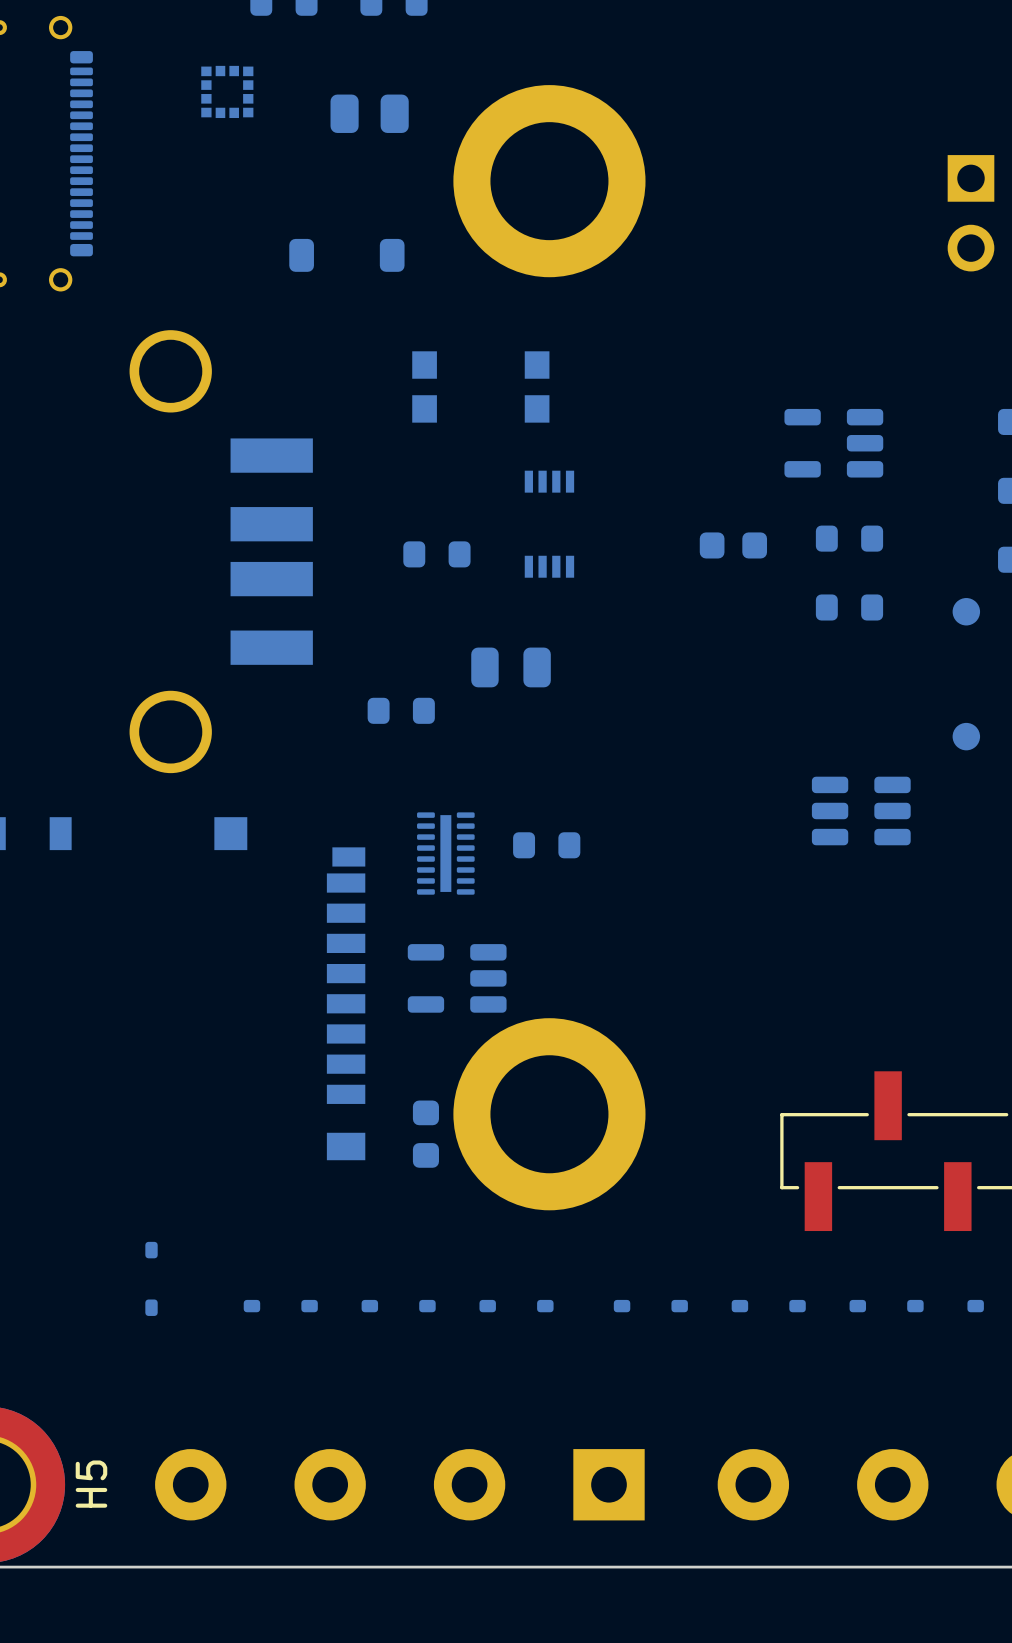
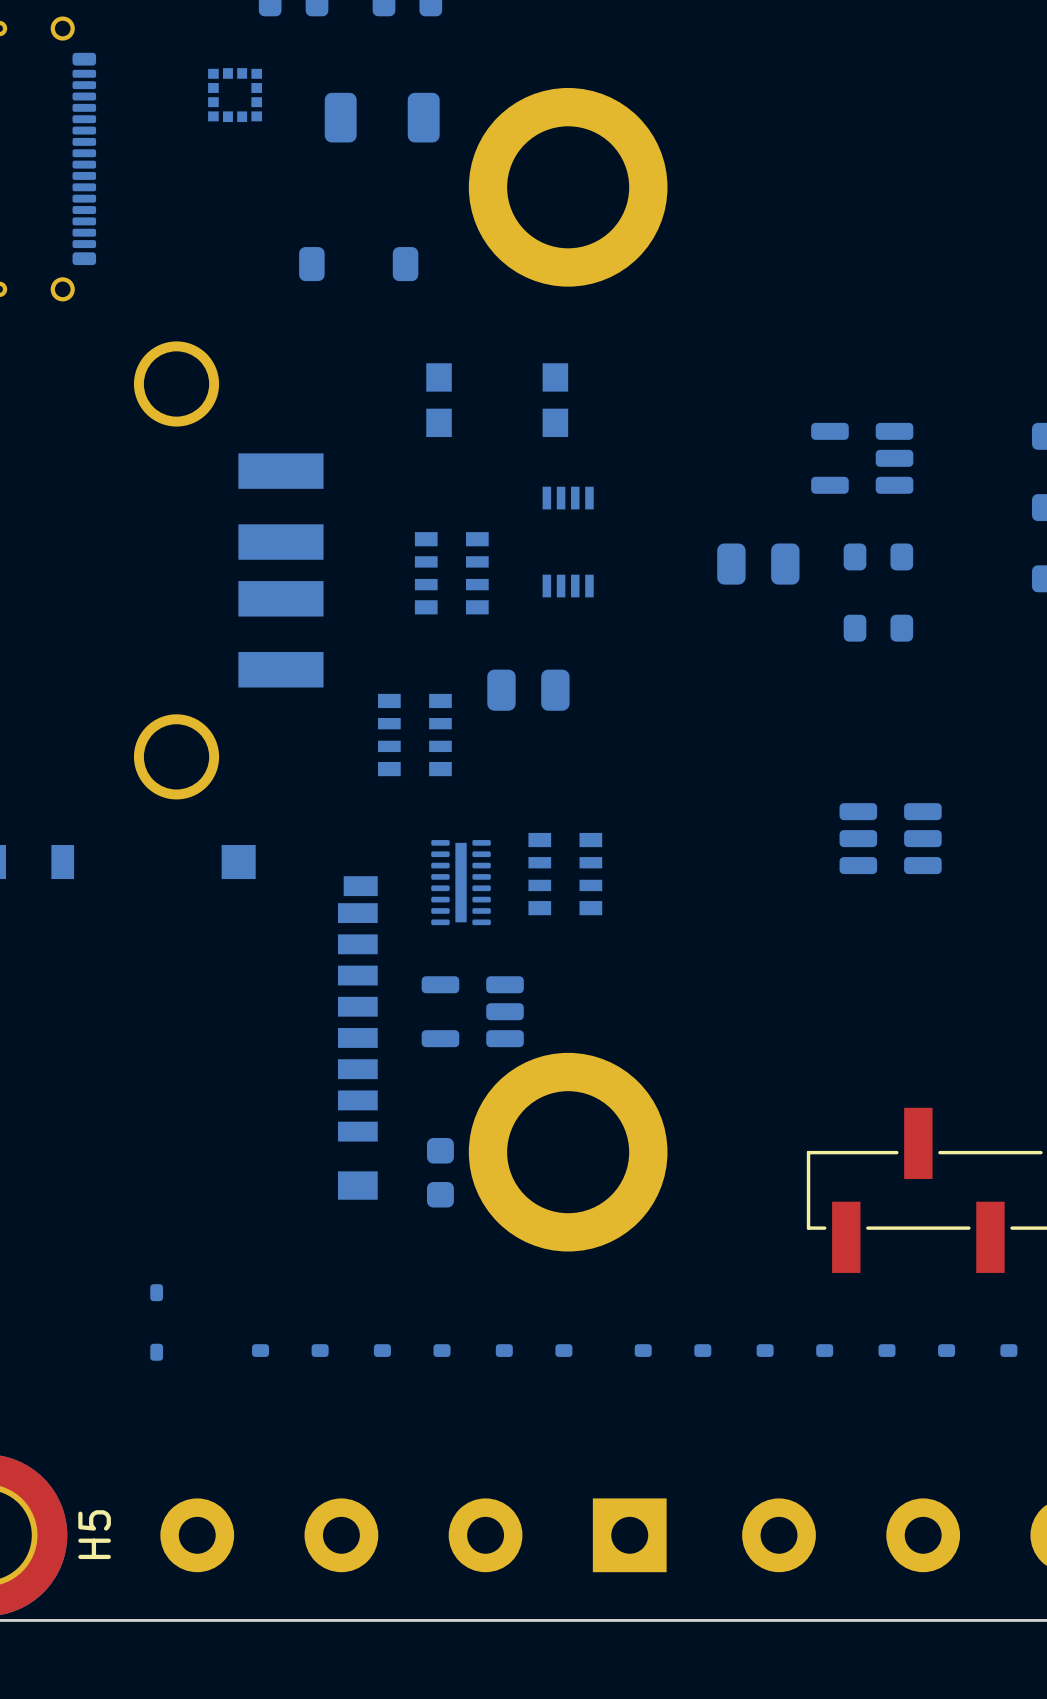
part footprint: [330, 94, 409, 133] -> [324, 92, 440, 143]
part: (970, 213) -> none
part footprint: [699, 532, 768, 559] -> [717, 543, 800, 585]
part footprint: [403, 541, 471, 568] -> [414, 532, 489, 615]
part: (966, 611) -> none
part footprint: [367, 697, 435, 724] -> [378, 693, 452, 777]
part: (966, 736) -> none
part footprint: [513, 832, 581, 859] -> [528, 832, 603, 916]

